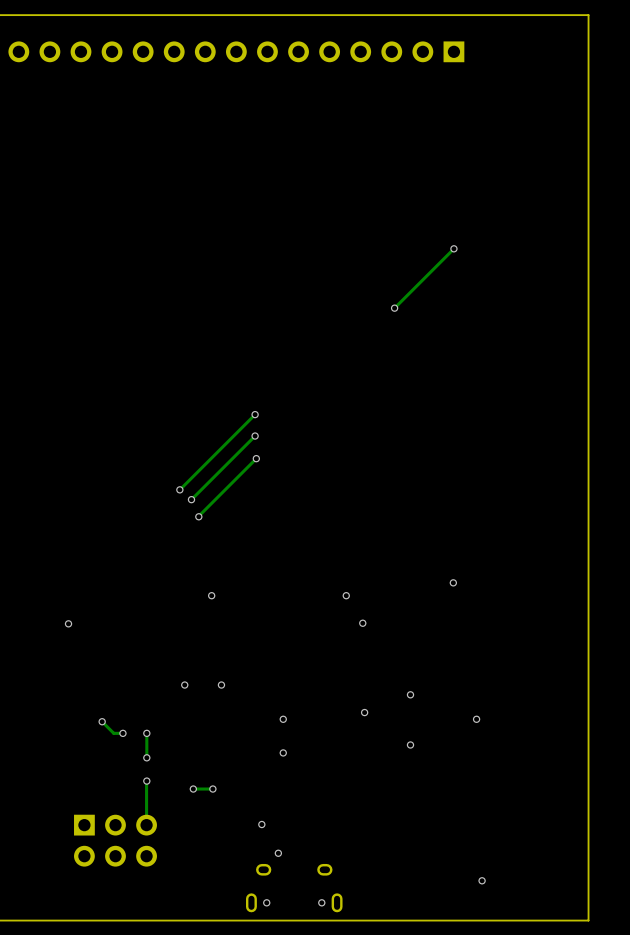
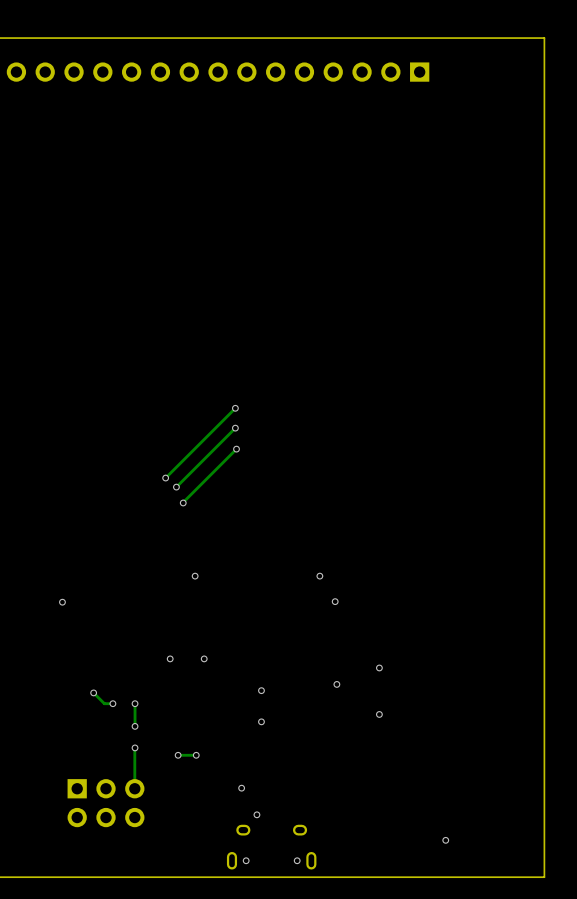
track: (453, 248) (394, 308) -> none
via: (453, 248) -> none
via: (394, 308) -> none
via: (453, 582) -> none
via: (476, 719) -> none

